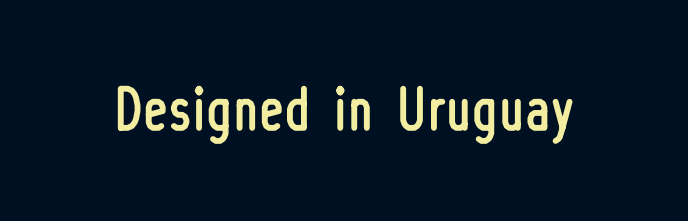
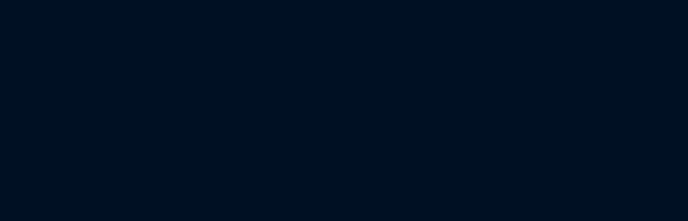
text: Designed in Uruguay (345, 114) -> none

